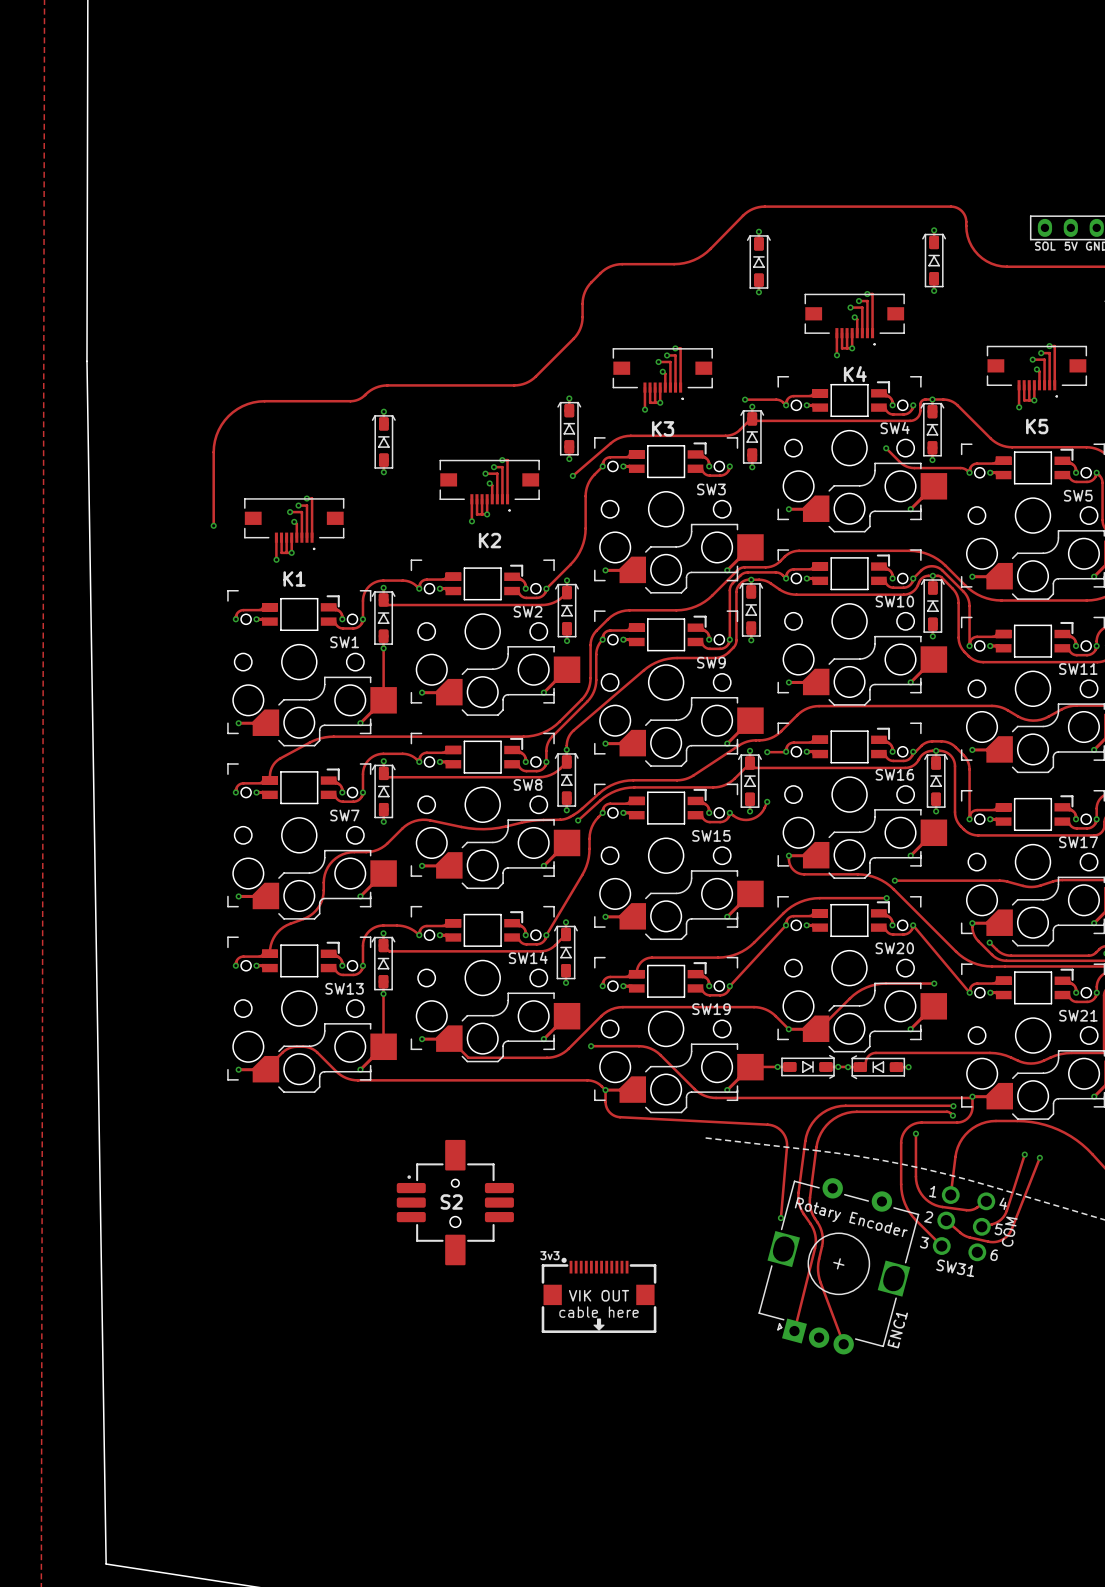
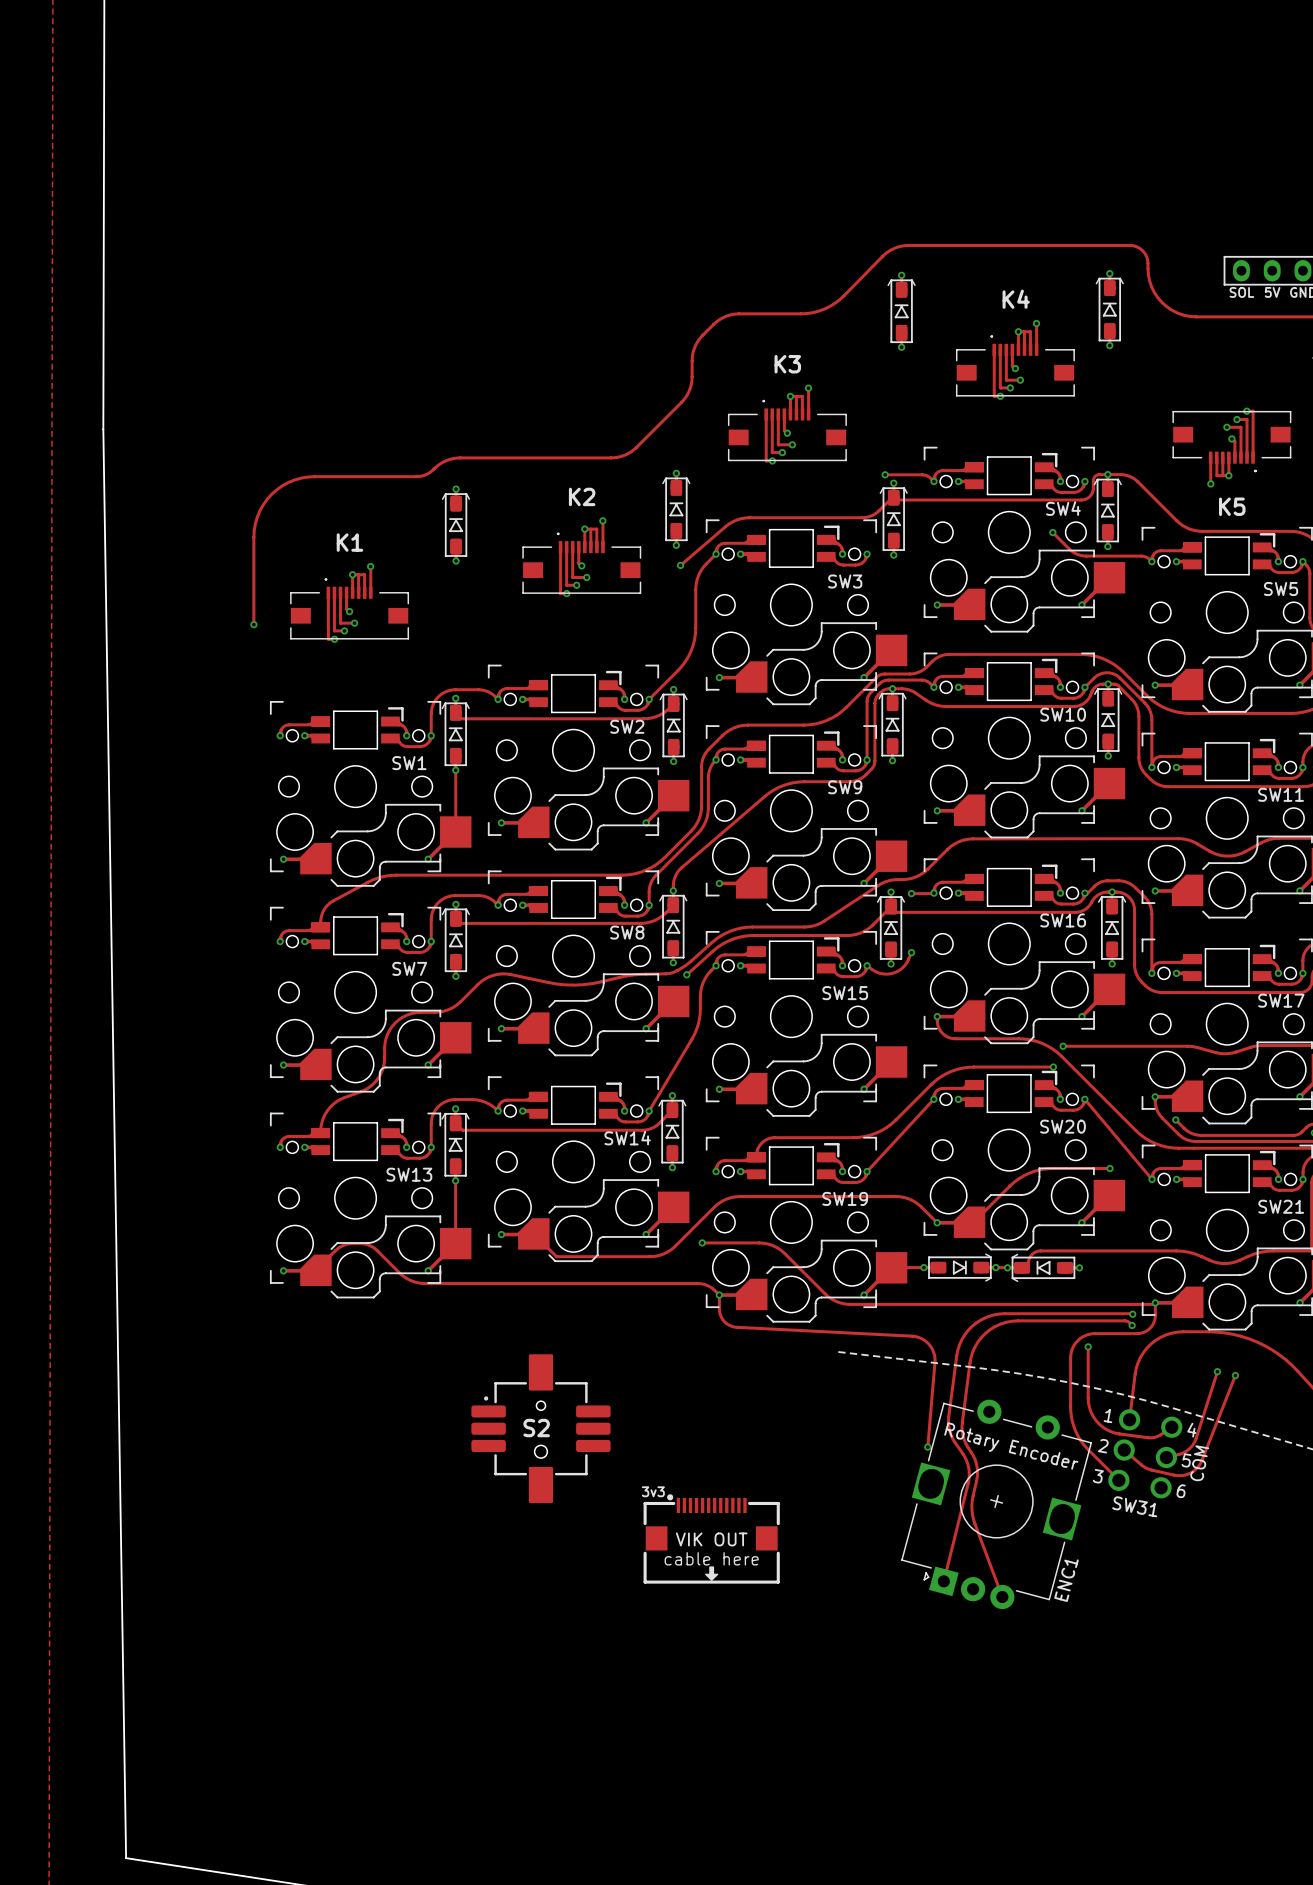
K4 rotation: 0° (854, 324) -> 180° (1015, 359)
K3 rotation: 0° (662, 379) -> 180° (787, 424)
K2 rotation: 0° (489, 490) -> 180° (581, 557)
K1 rotation: 0° (294, 529) -> 180° (349, 602)

